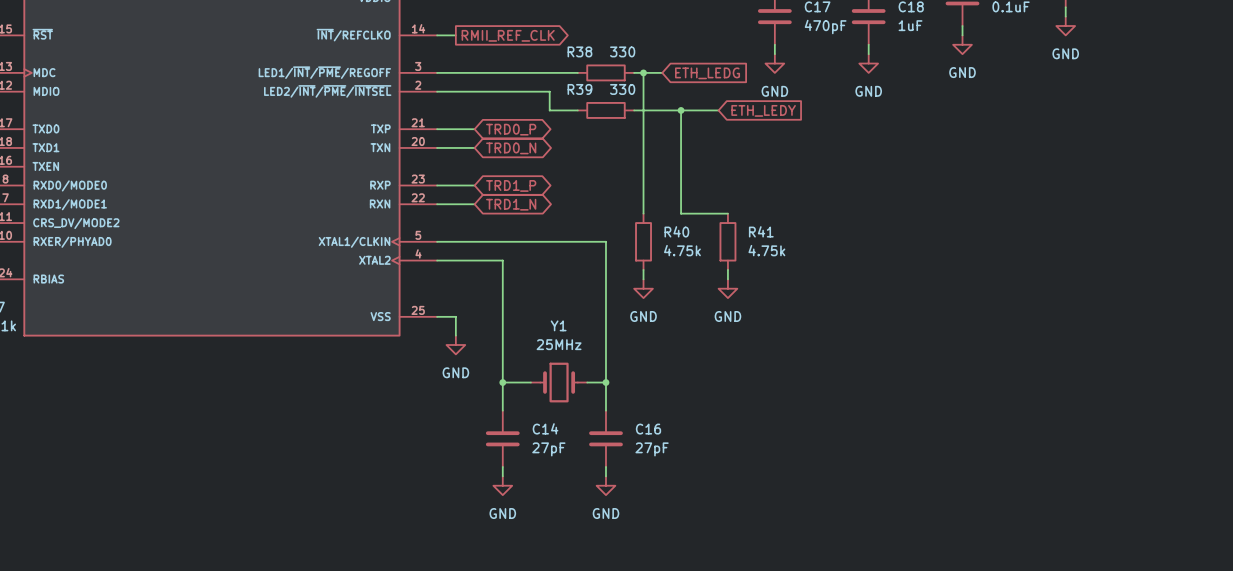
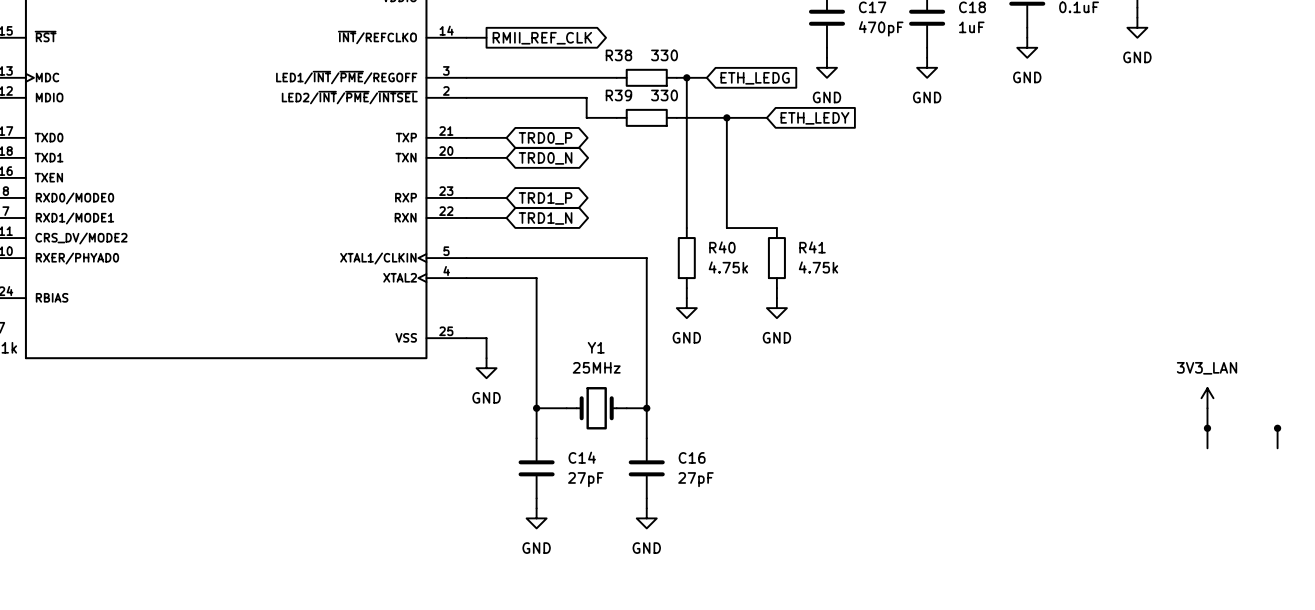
power symbol: none -> 3V3_LAN (1207, 398)
wire: none -> (1207, 408) (1207, 448)
junction: none -> (1207, 428)
wire: none -> (1277, 428) (1277, 448)
junction: none -> (1277, 428)

